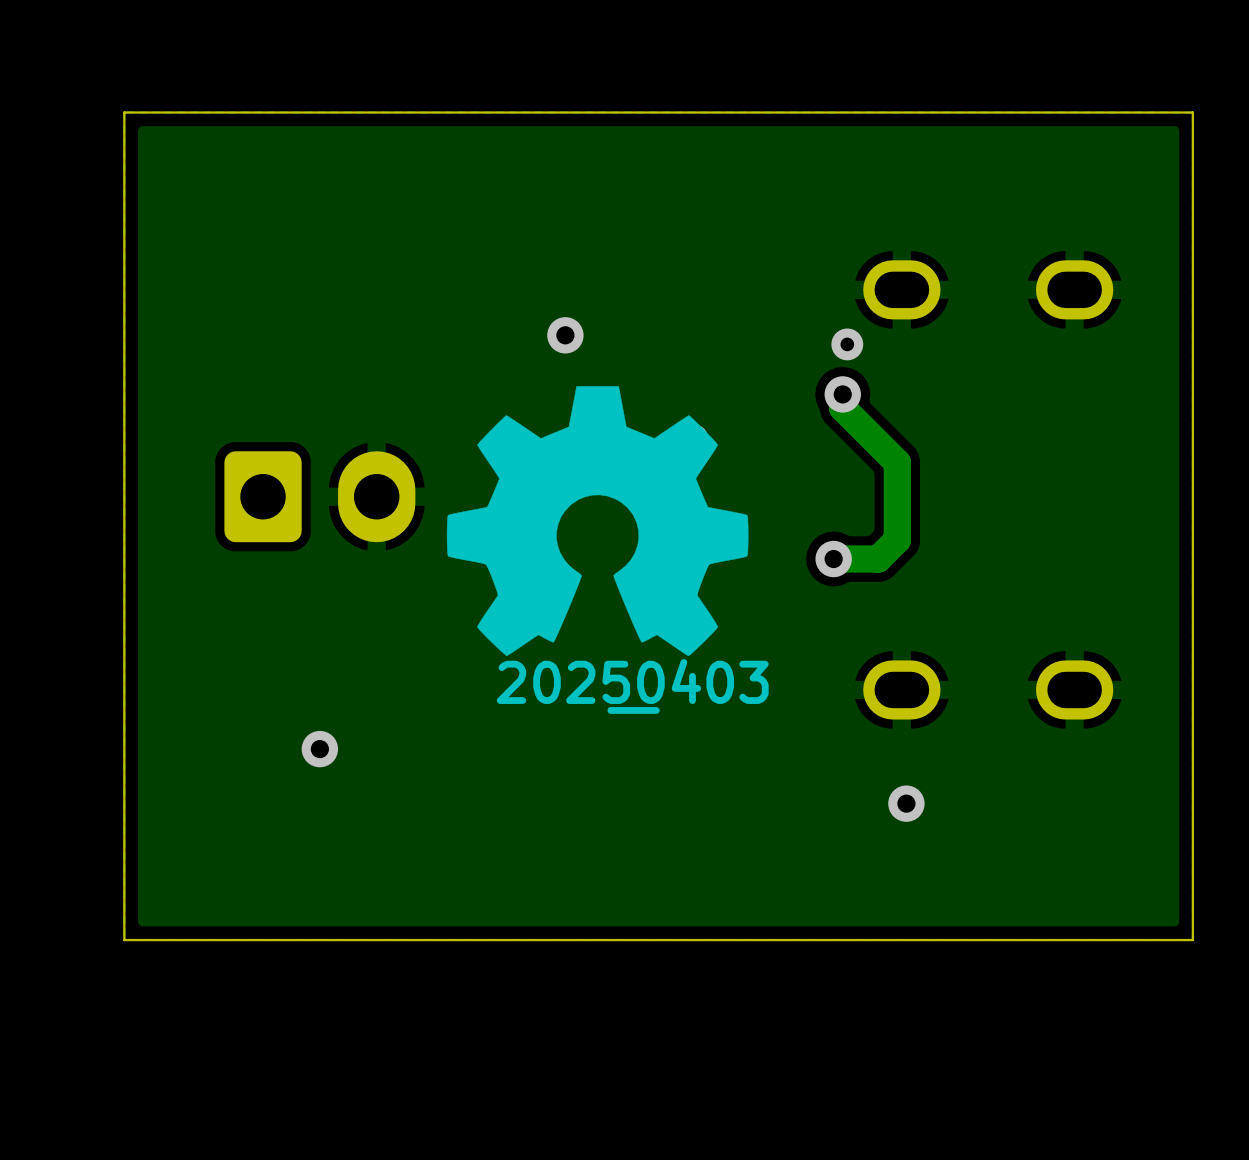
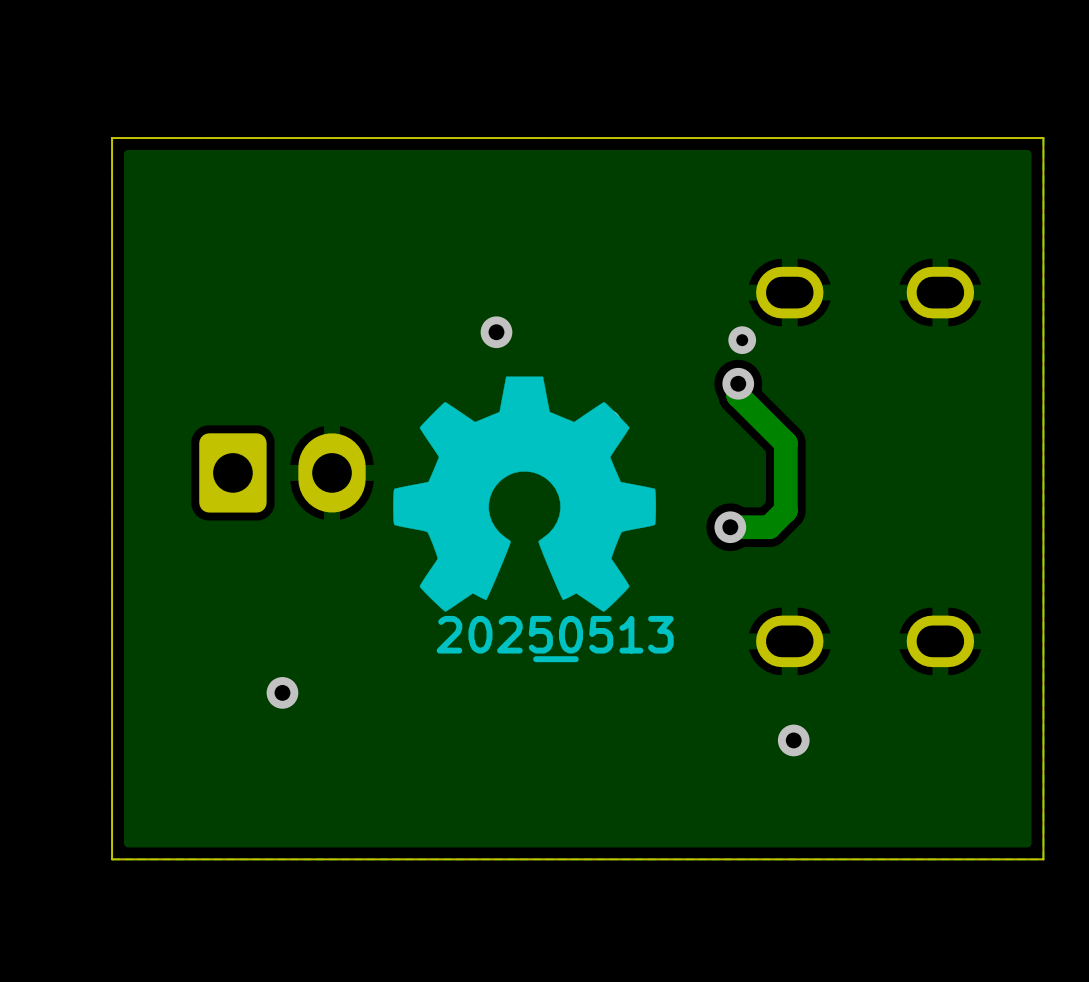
drawing shape: [496, 659, 769, 714] -> [436, 615, 674, 663]

